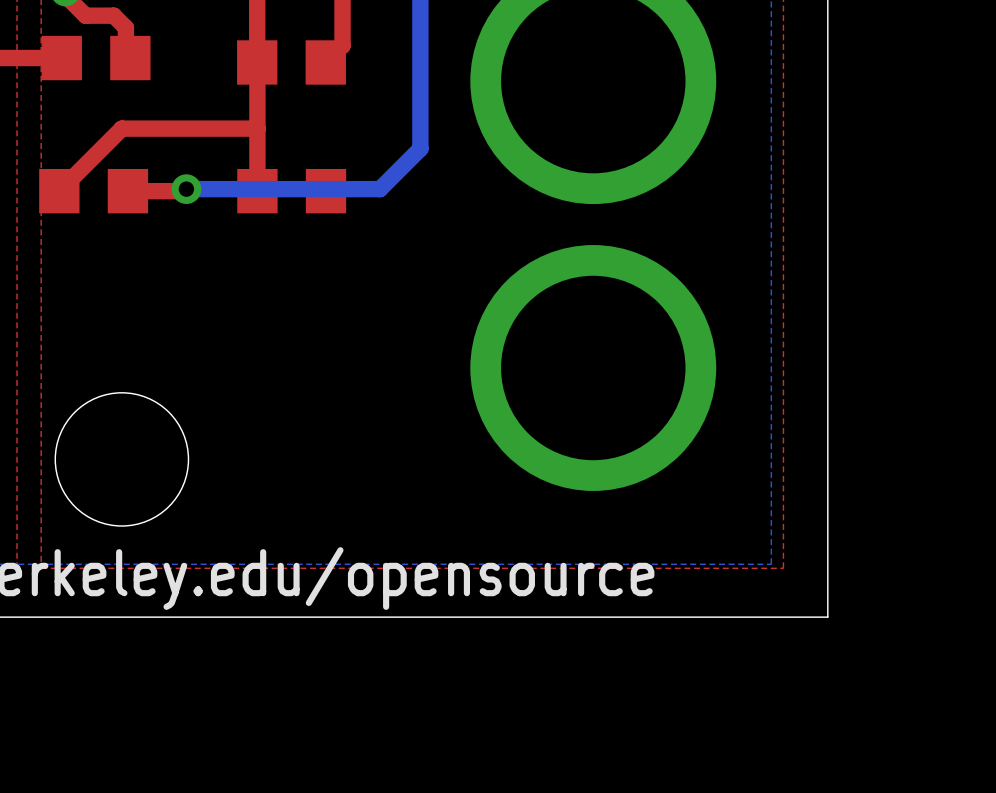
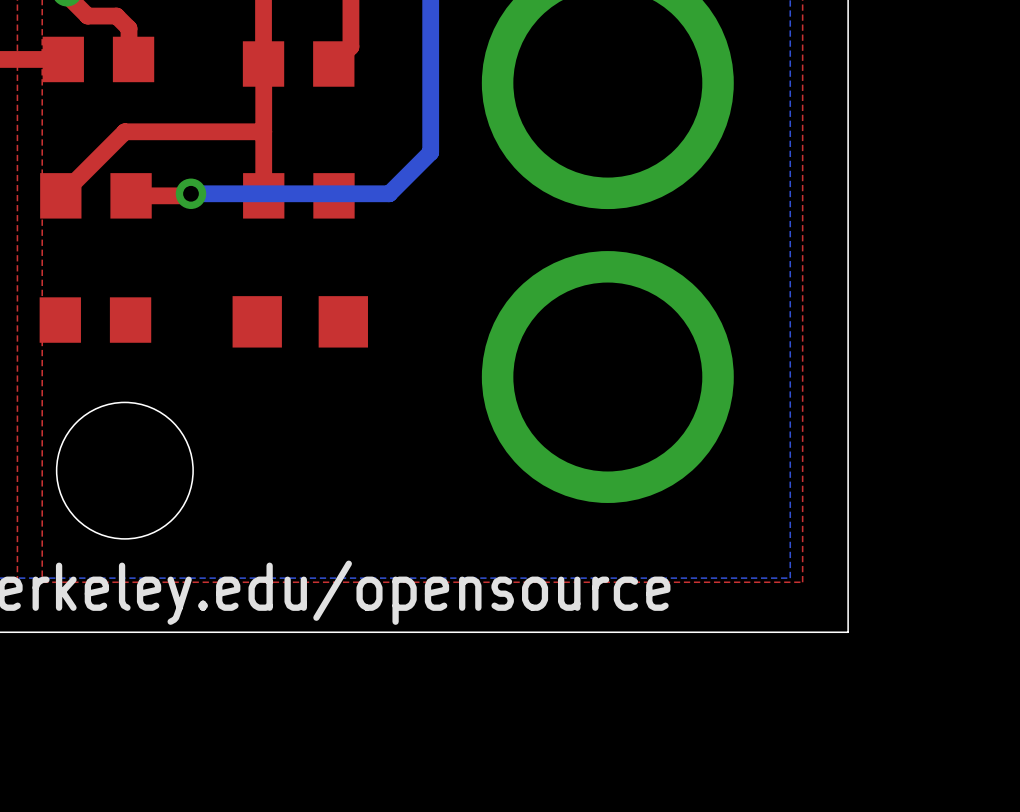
part: none -> (95, 320)
part: none -> (300, 321)

